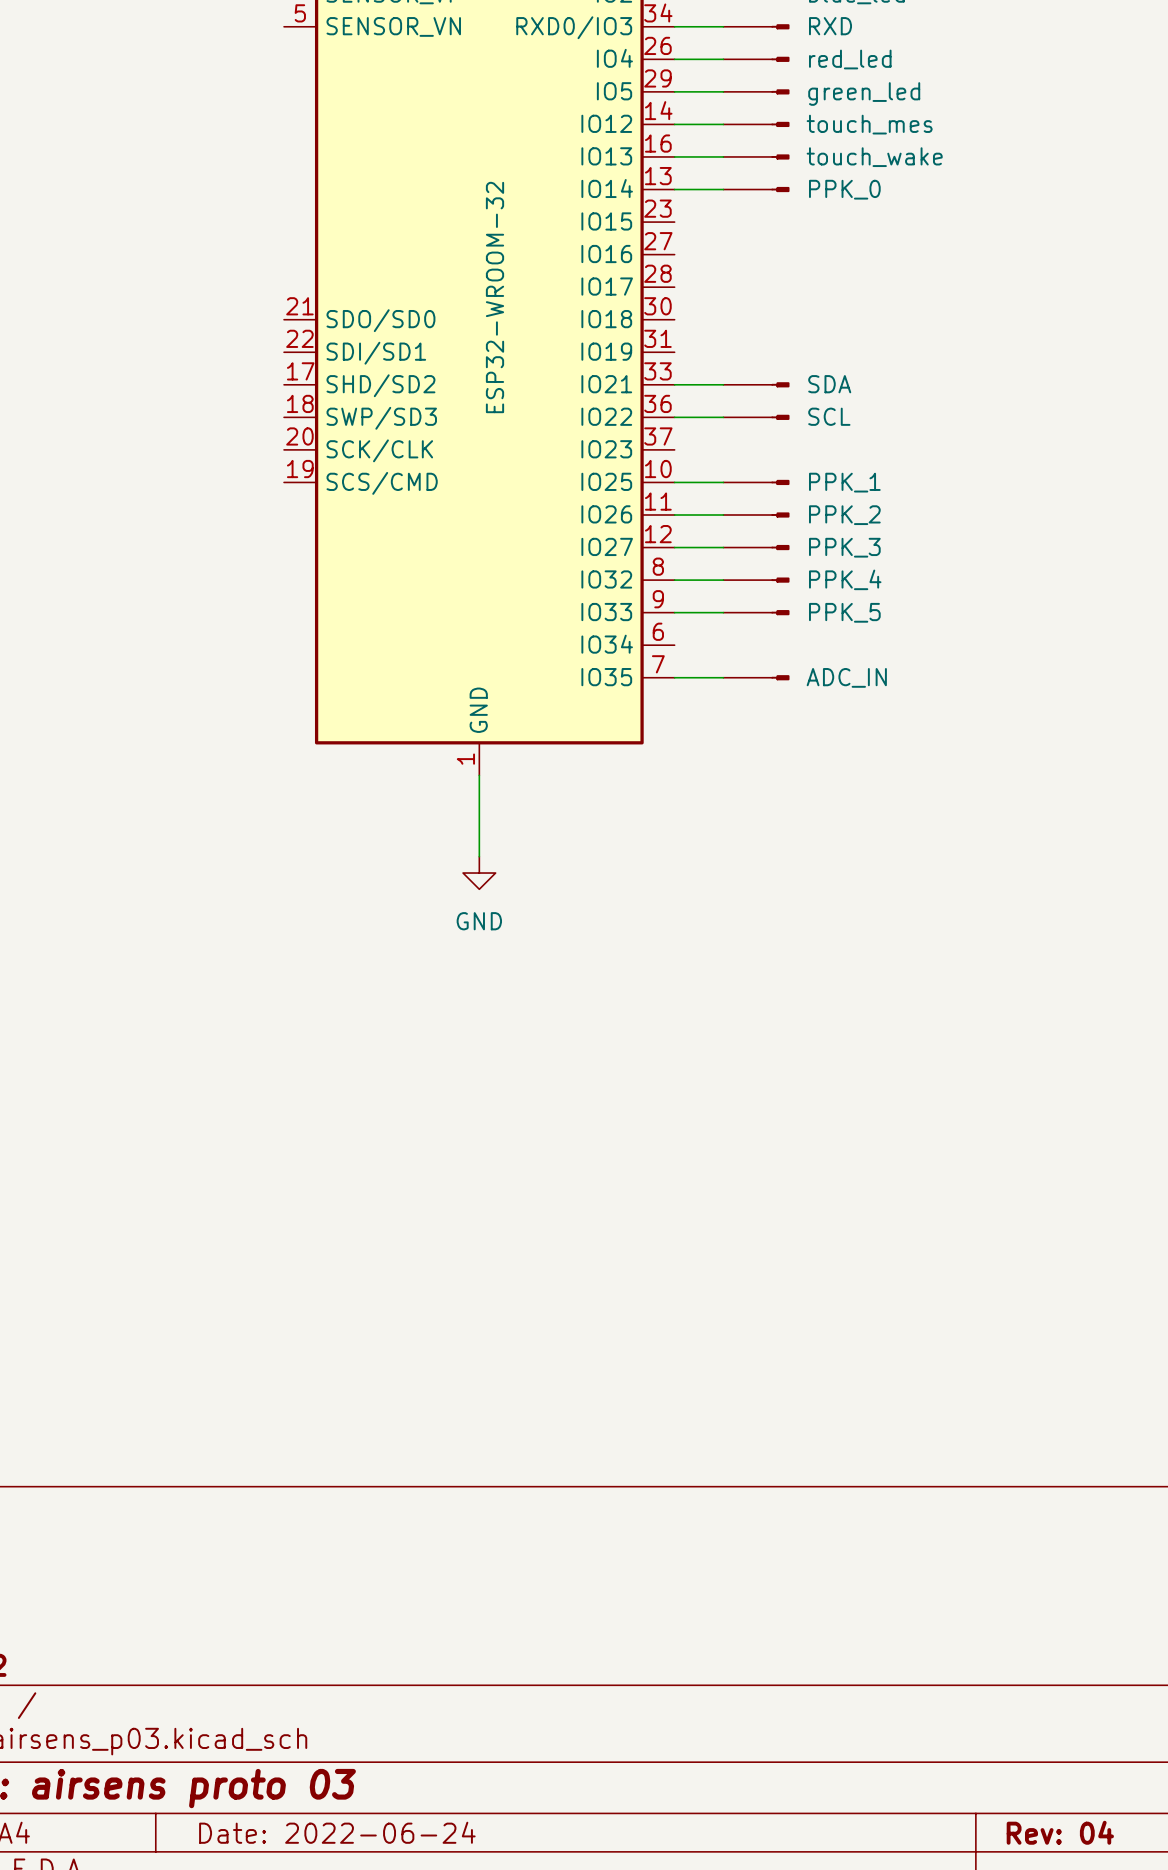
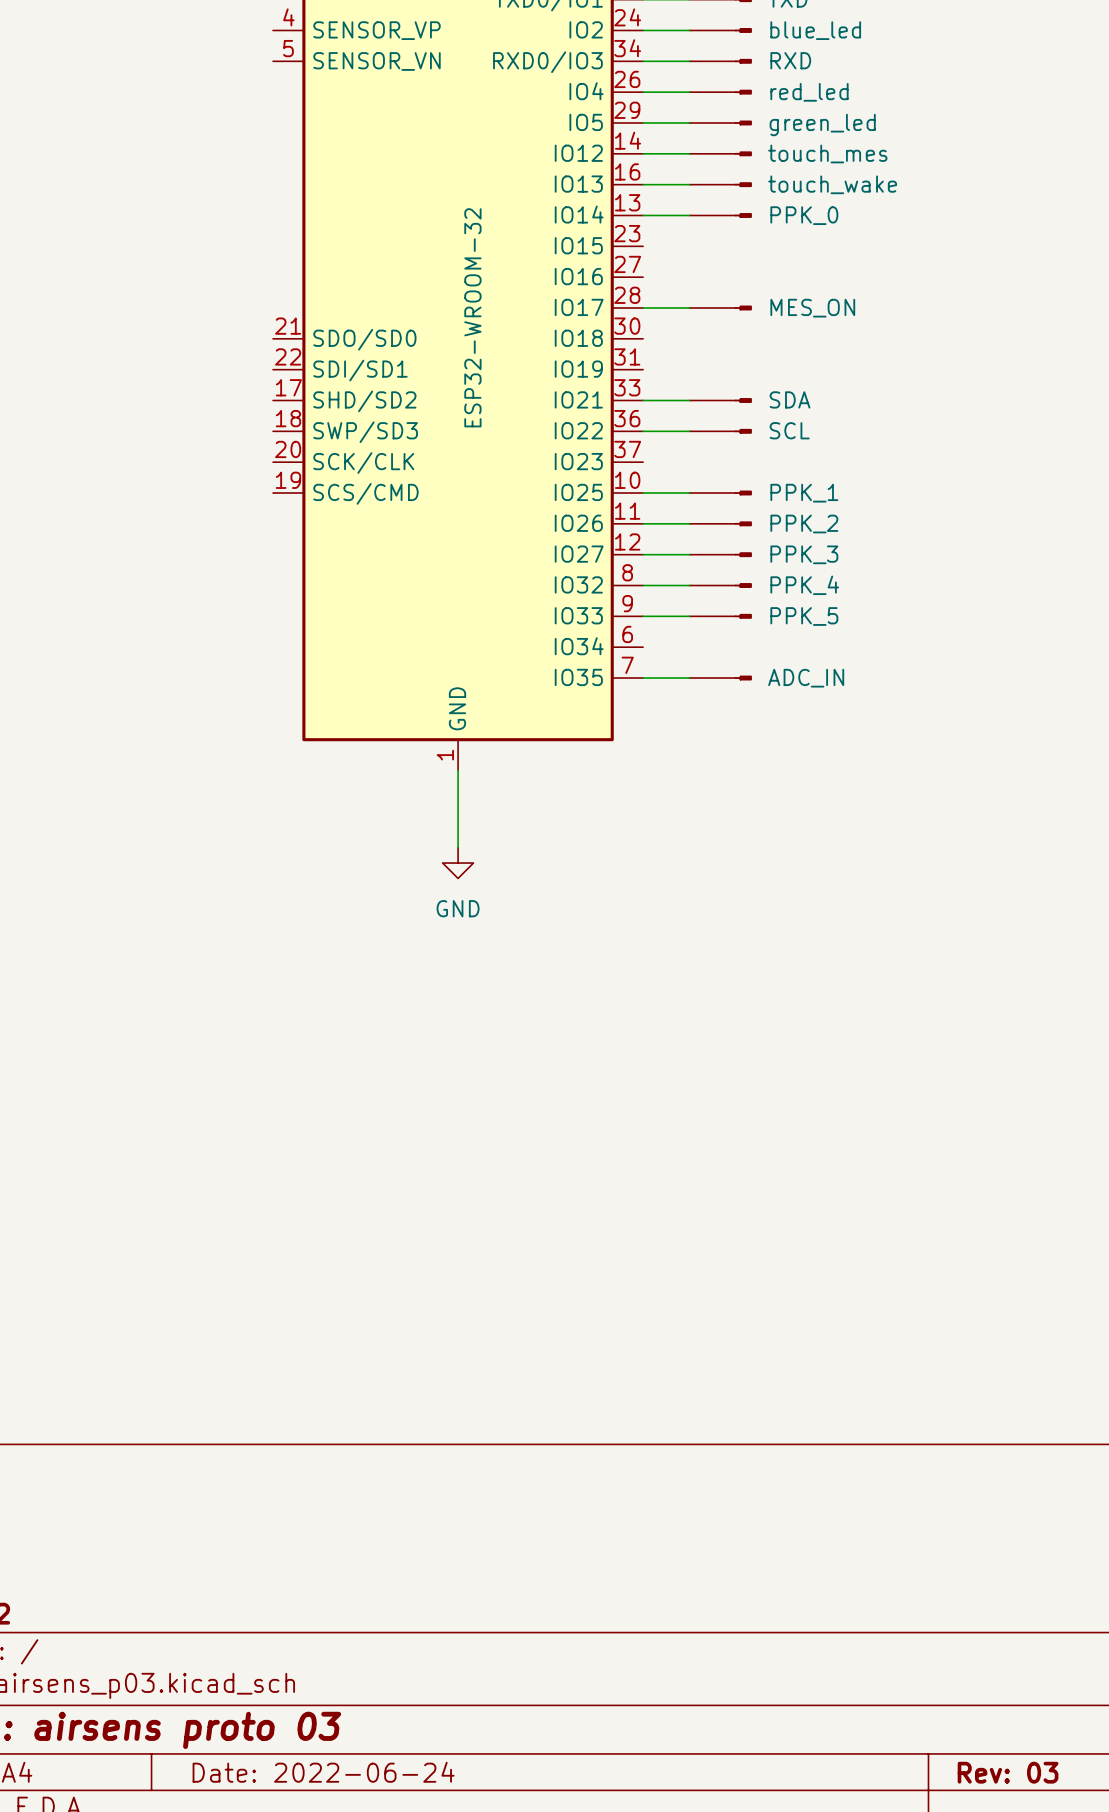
wire: none -> (643, 307) (689, 307)
part: none -> MES_ON (720, 307)
title block: Rev: 04 (1060, 1832) -> Rev: 03 (1008, 1772)

